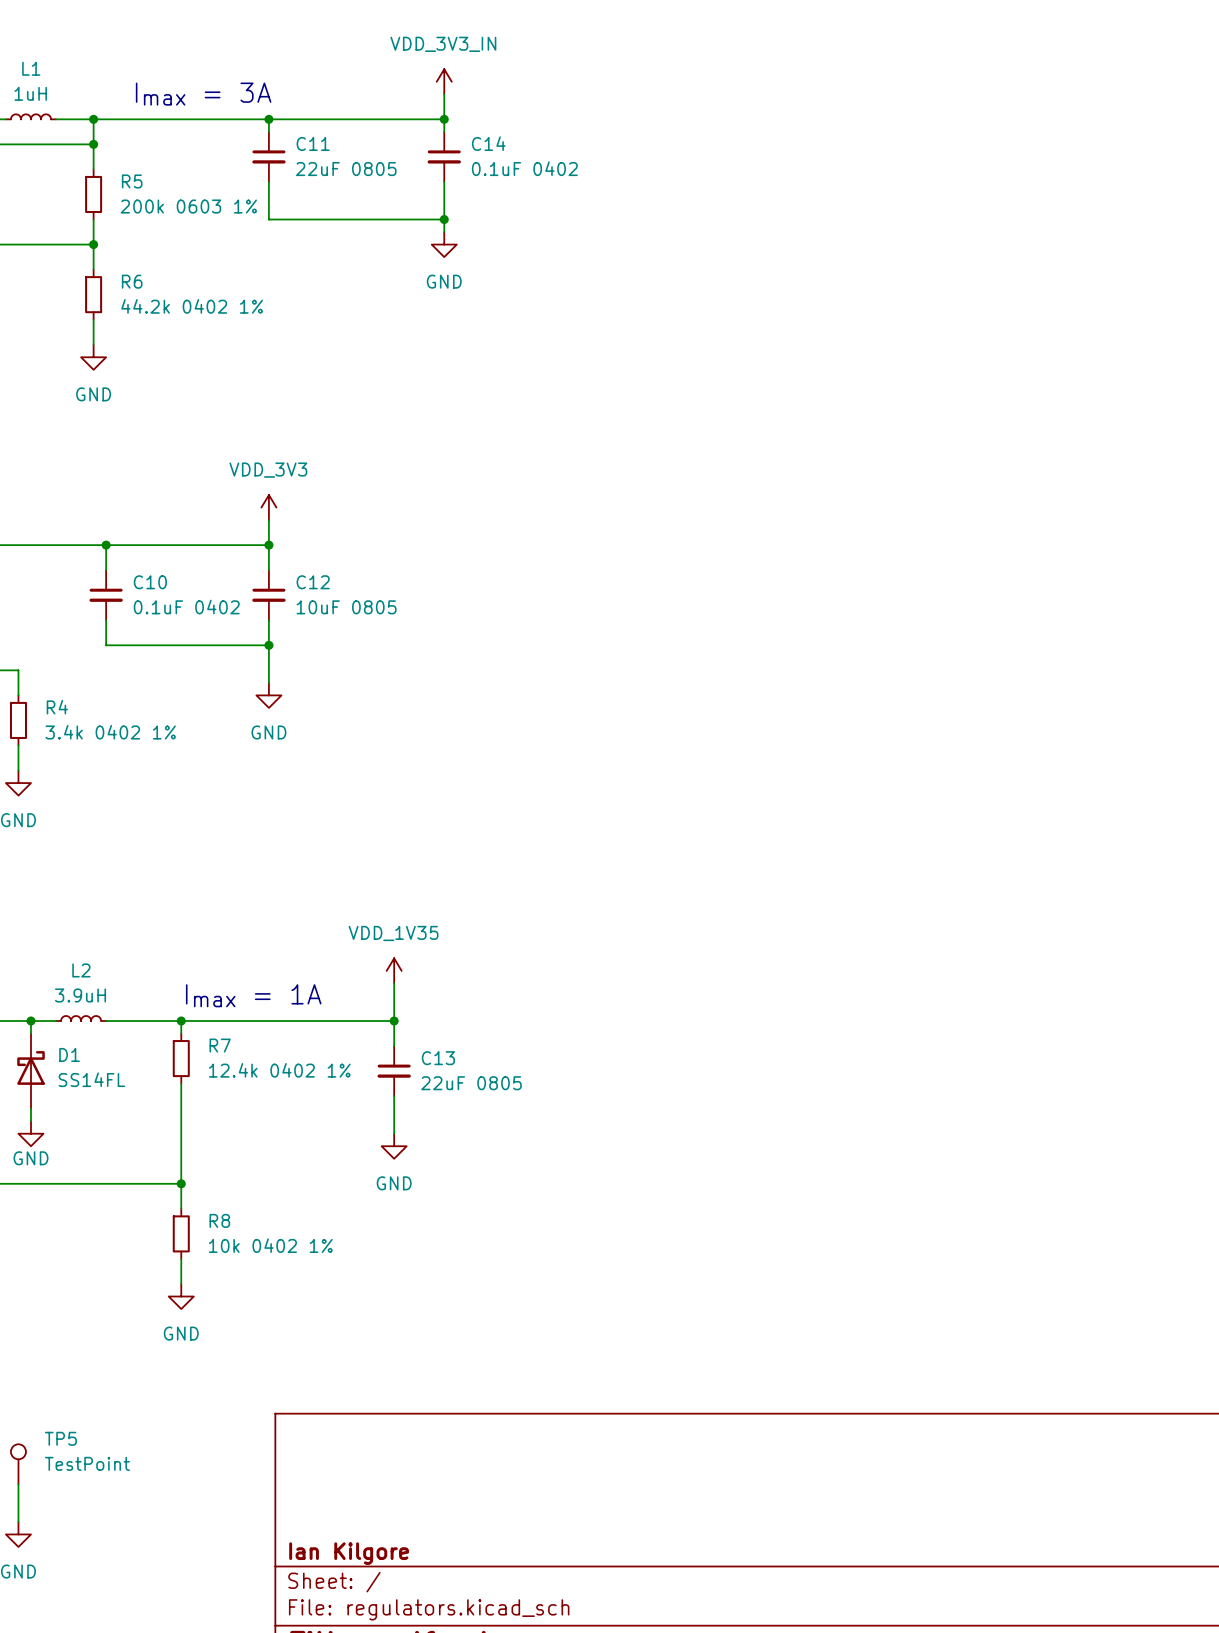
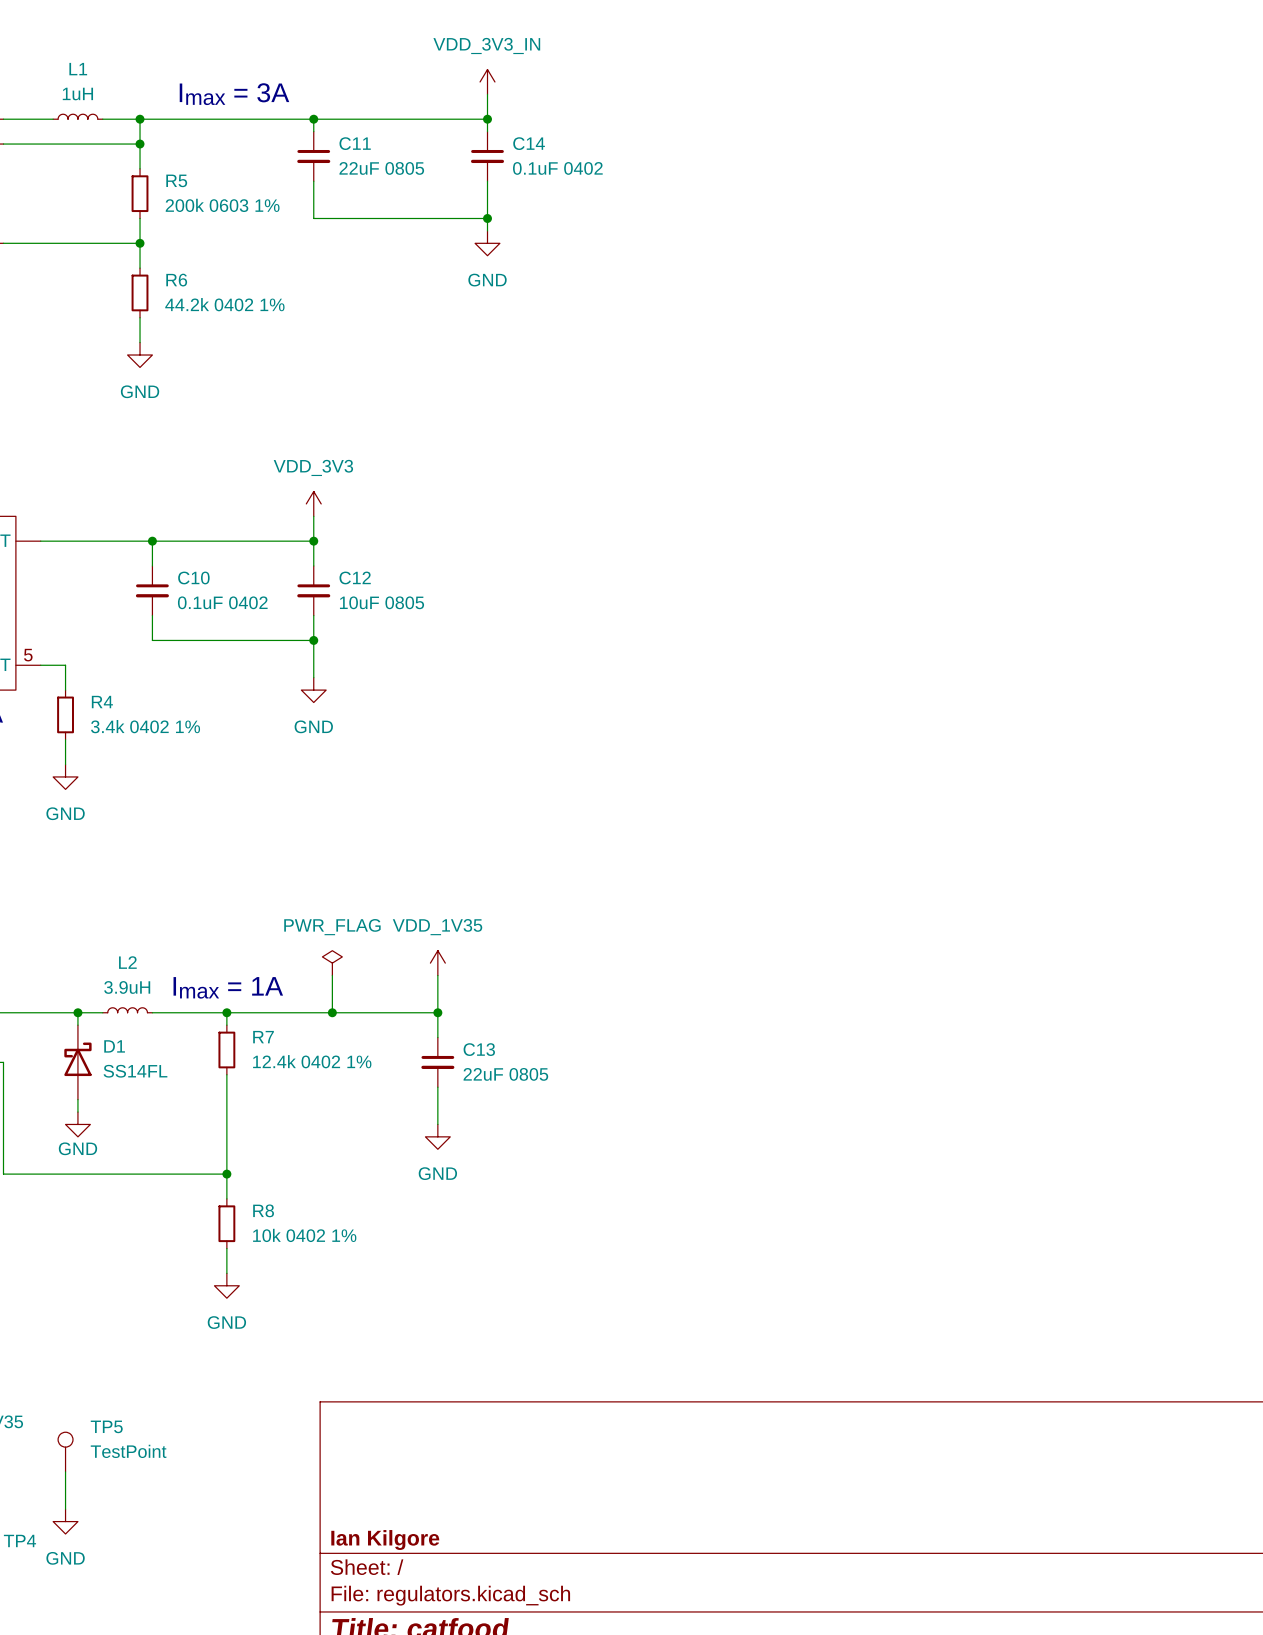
power symbol: none -> PWR_FLAG (332, 963)
wire: none -> (332, 975) (332, 1012)
text position: Imax = 1A (253, 995) -> Imax = 1A (228, 987)
junction: none -> (332, 1012)

